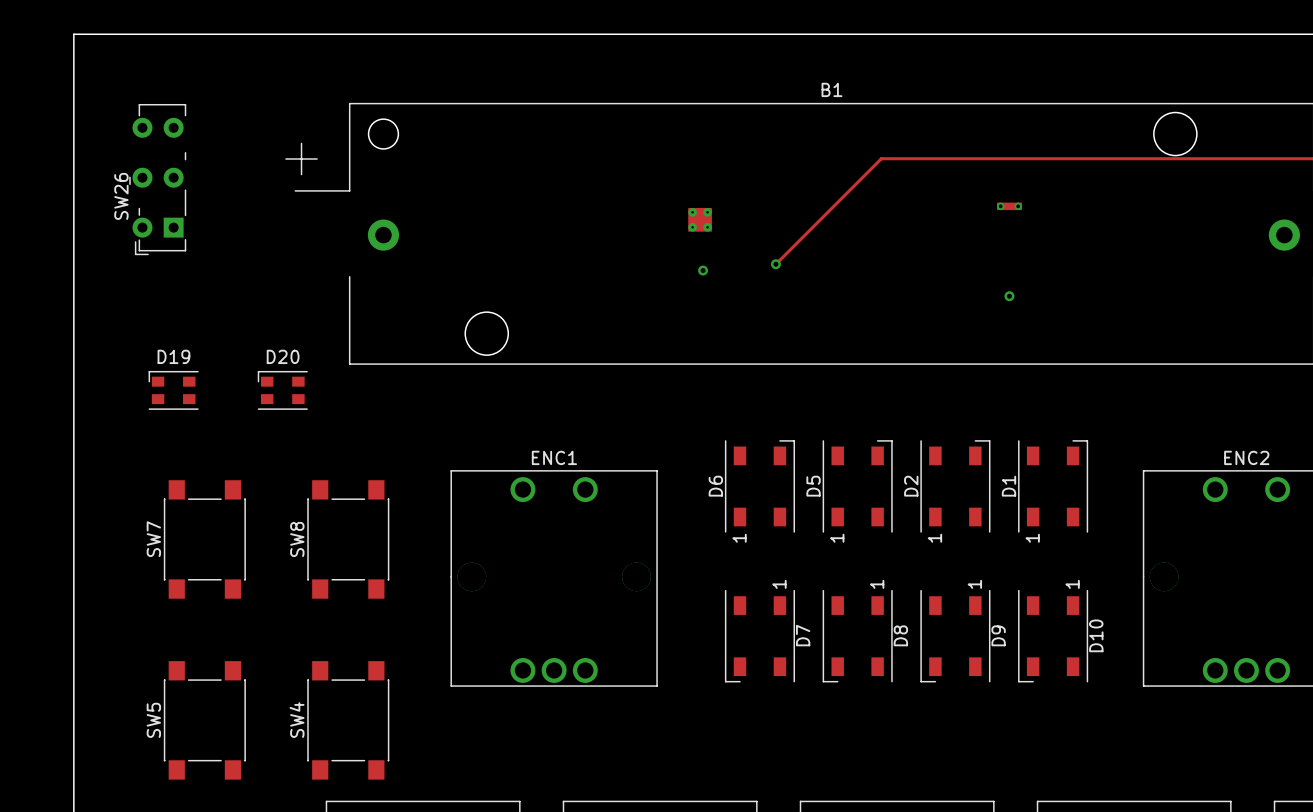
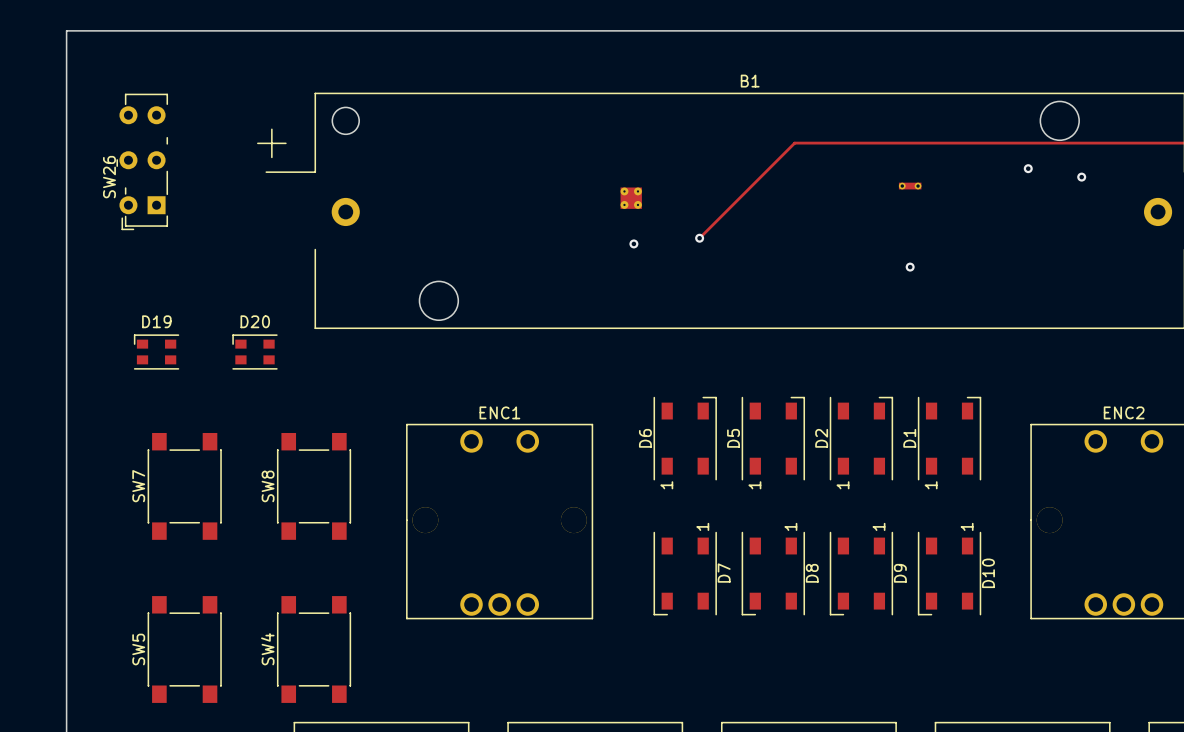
via: none -> (1028, 168)
via: none -> (1081, 177)

